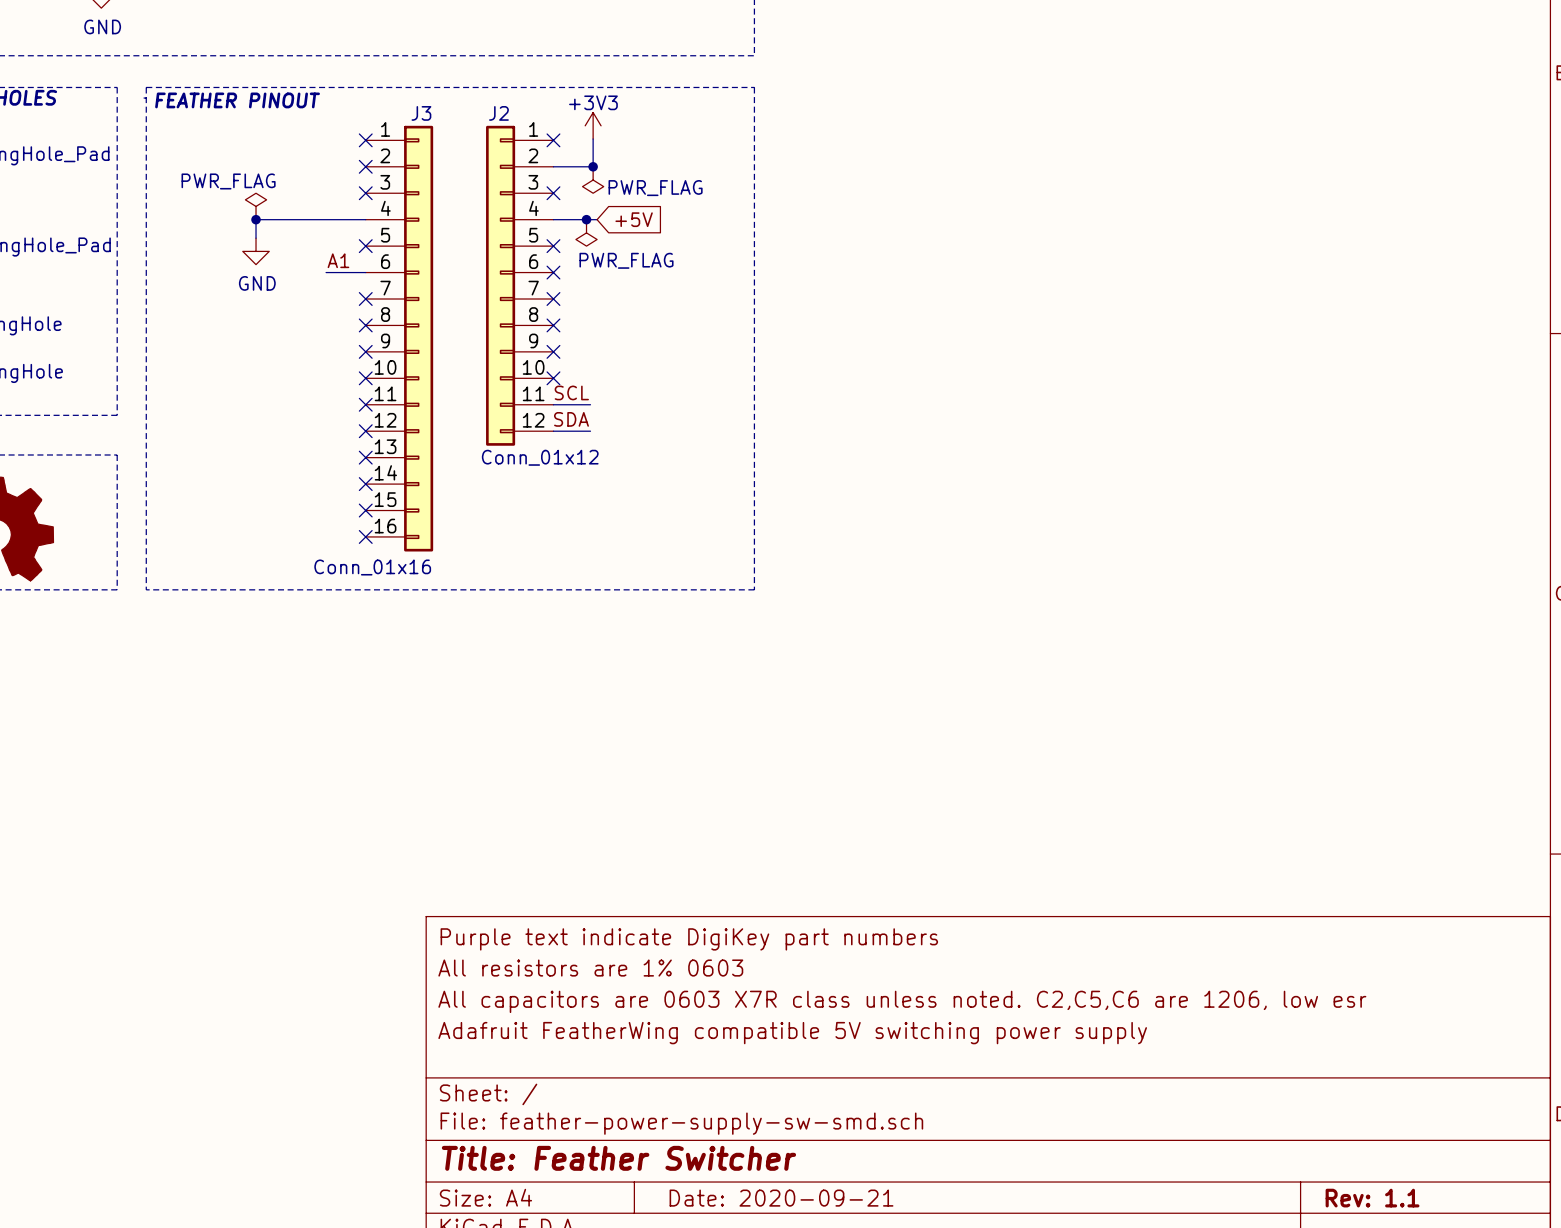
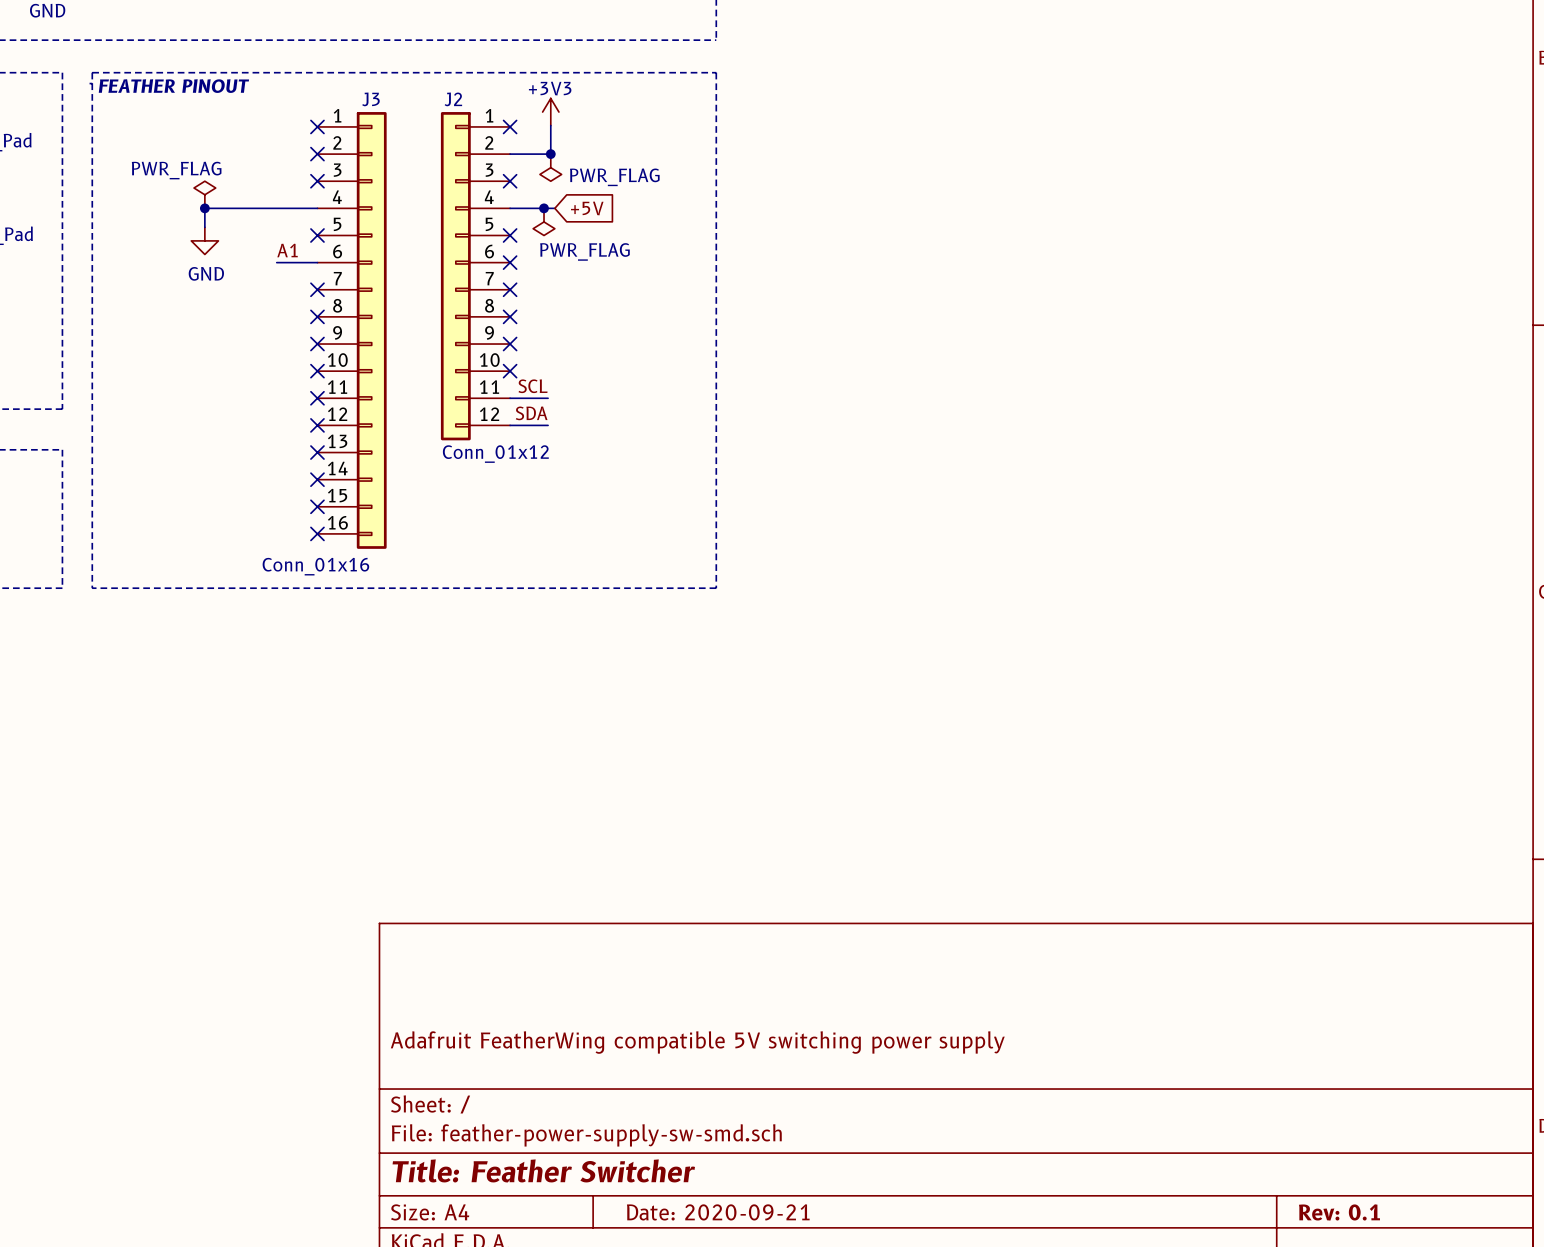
title block: Purple text indicate DigiKey part numbers (689, 939) -> none
title block: All resistors are 1% 0603 (590, 968) -> none
title block: All capacitors are 0603 X7R class unless noted. C2,C5,C6 are 1206, low esr (902, 1001) -> none
title block: Rev: 1.1 (1372, 1198) -> Rev: 0.1 (1339, 1212)

